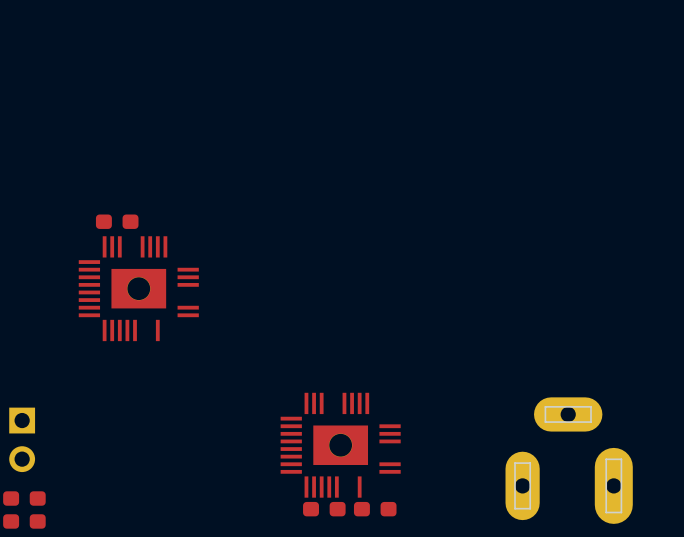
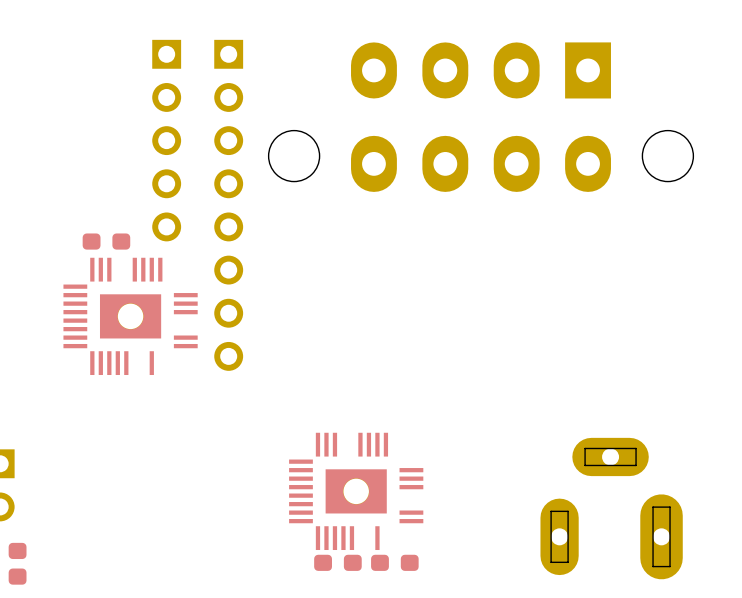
part: none -> (481, 117)
part: none -> (166, 140)
part: none -> (228, 205)

